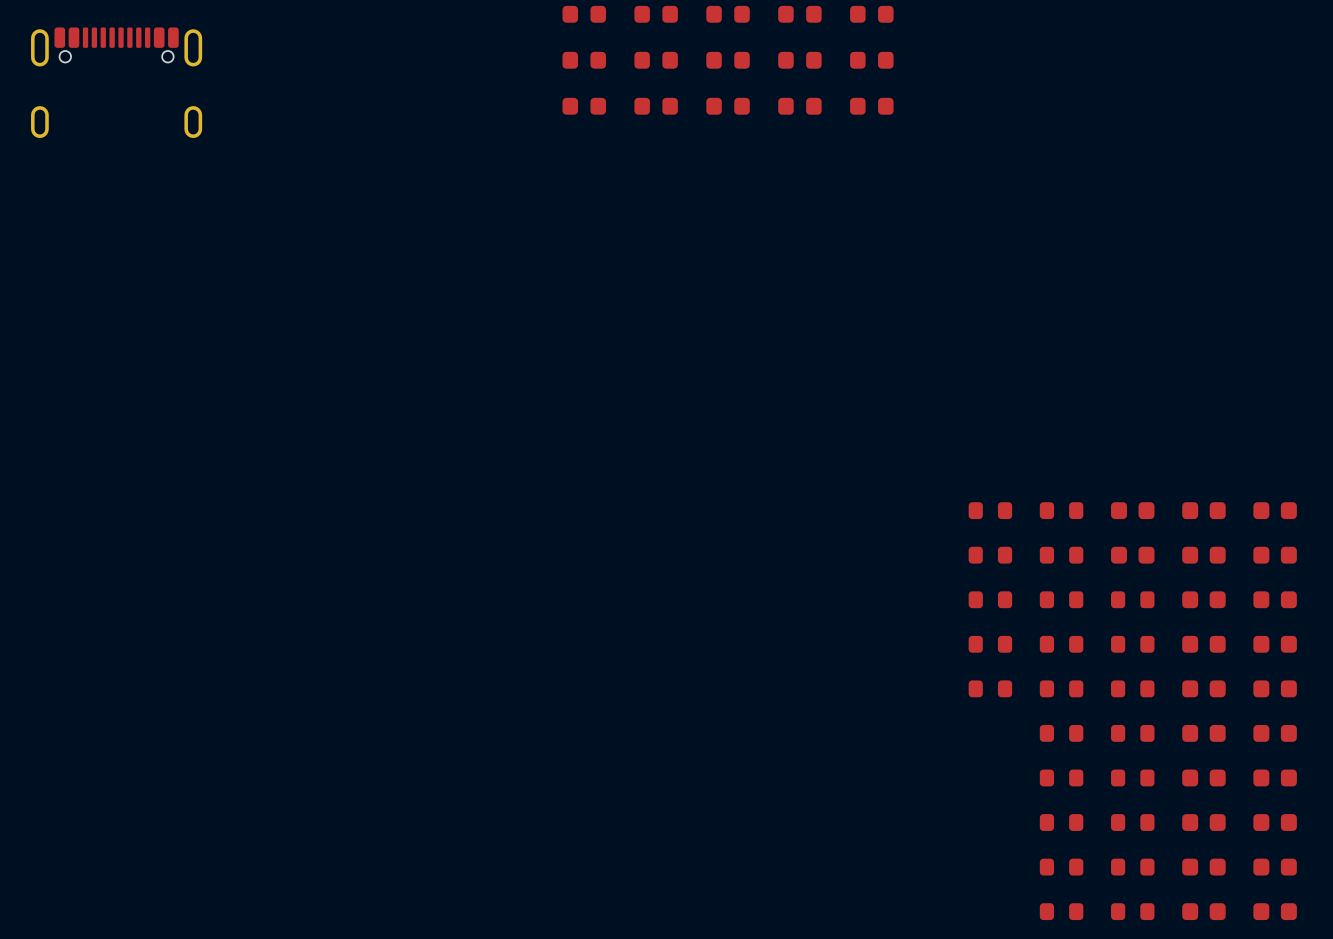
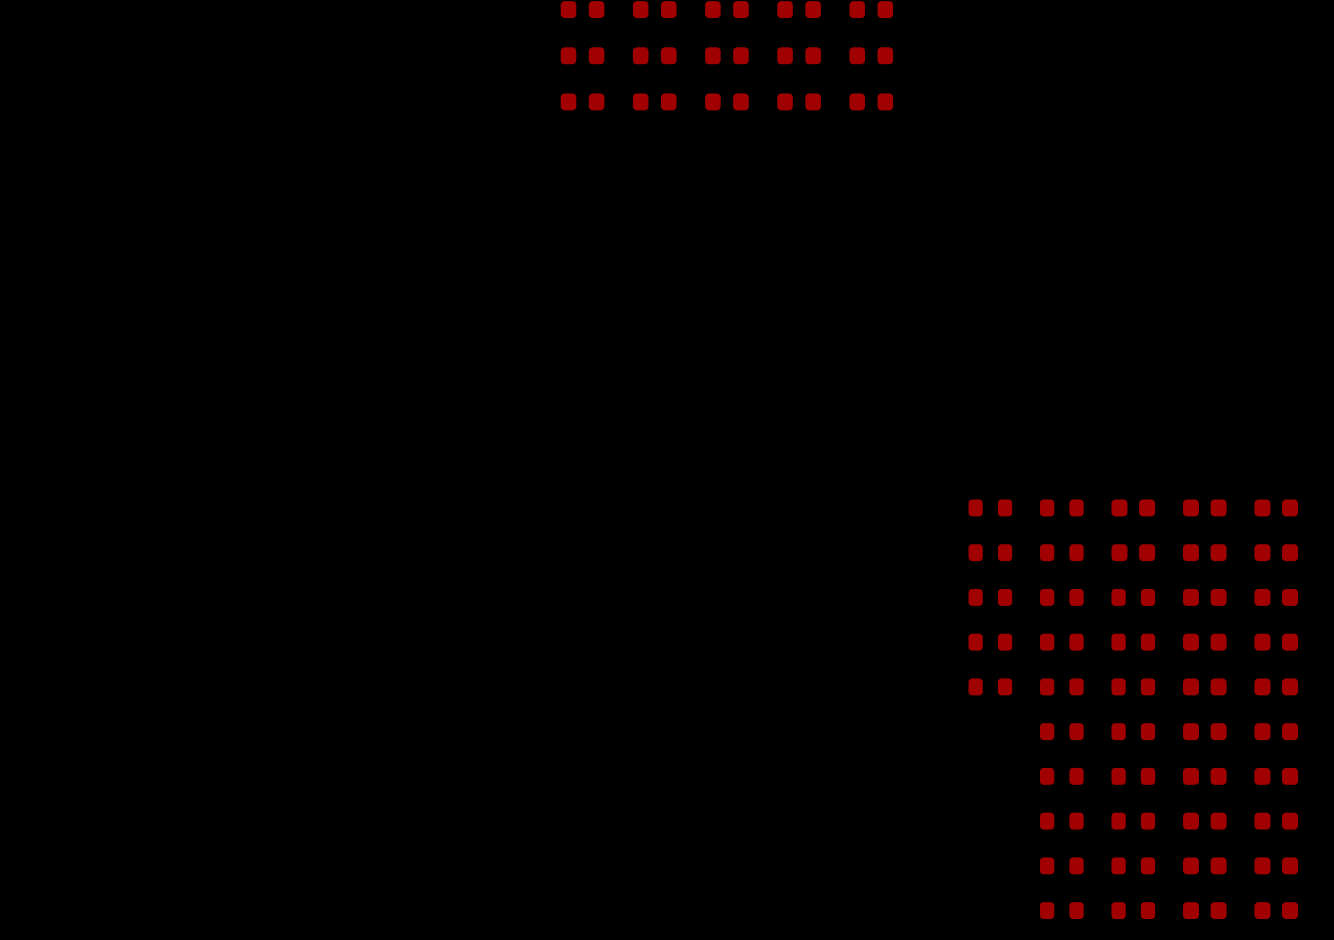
part: (116, 82) -> none

